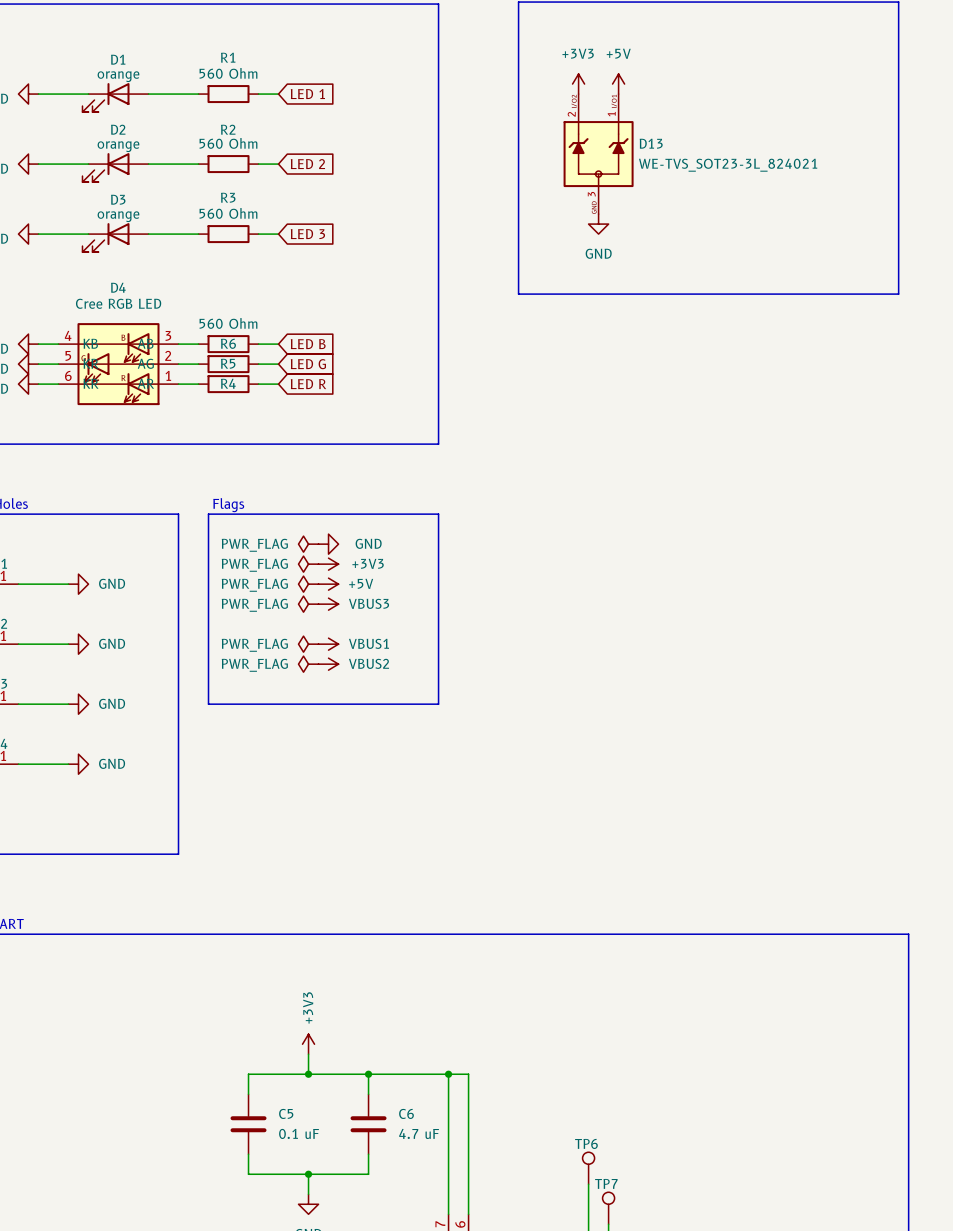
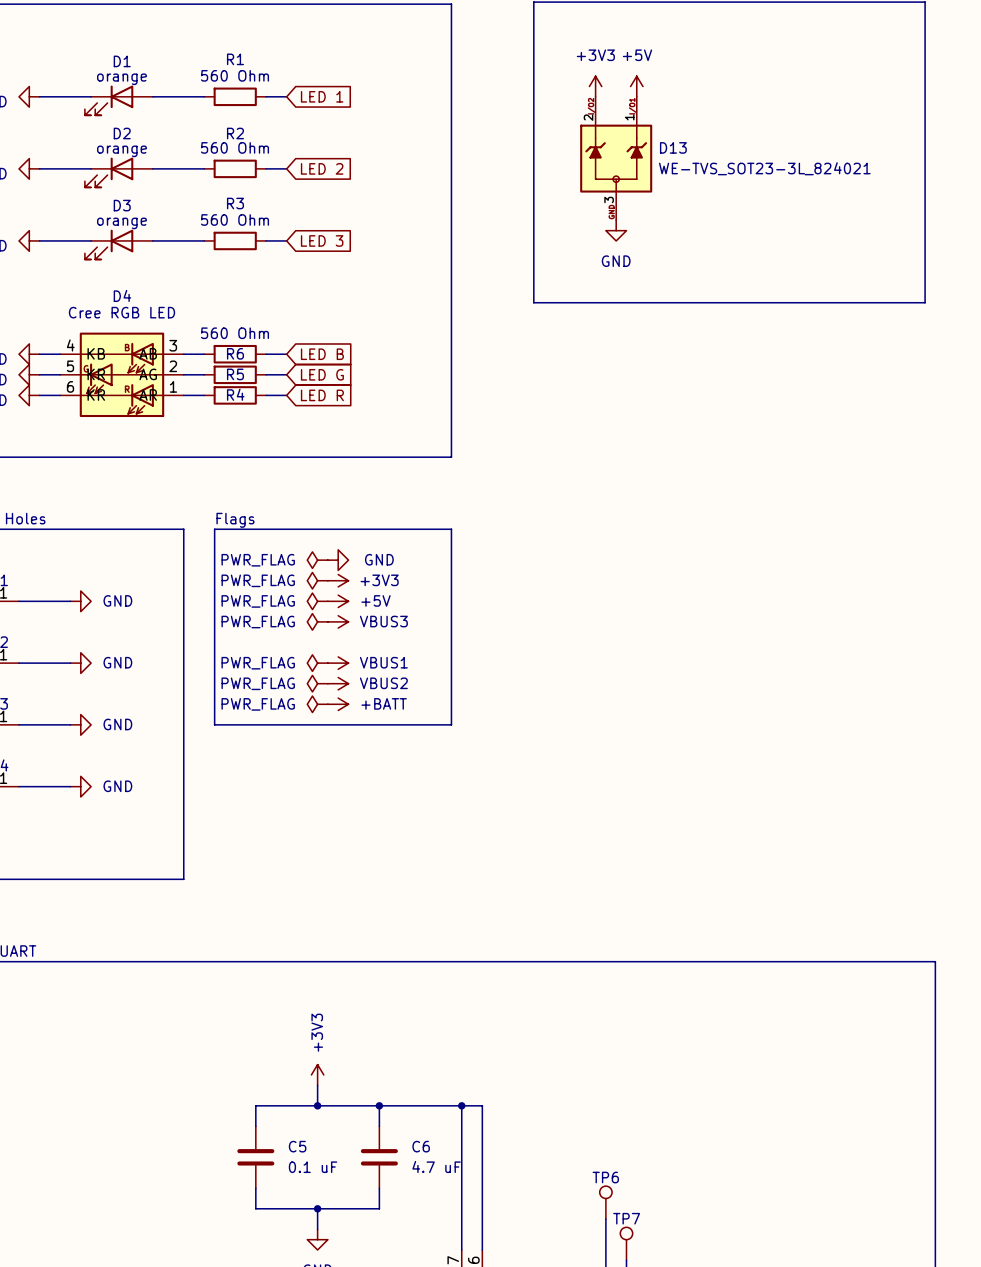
power symbol: none -> PWR_FLAG (317, 704)
power symbol: none -> +BATT (338, 704)

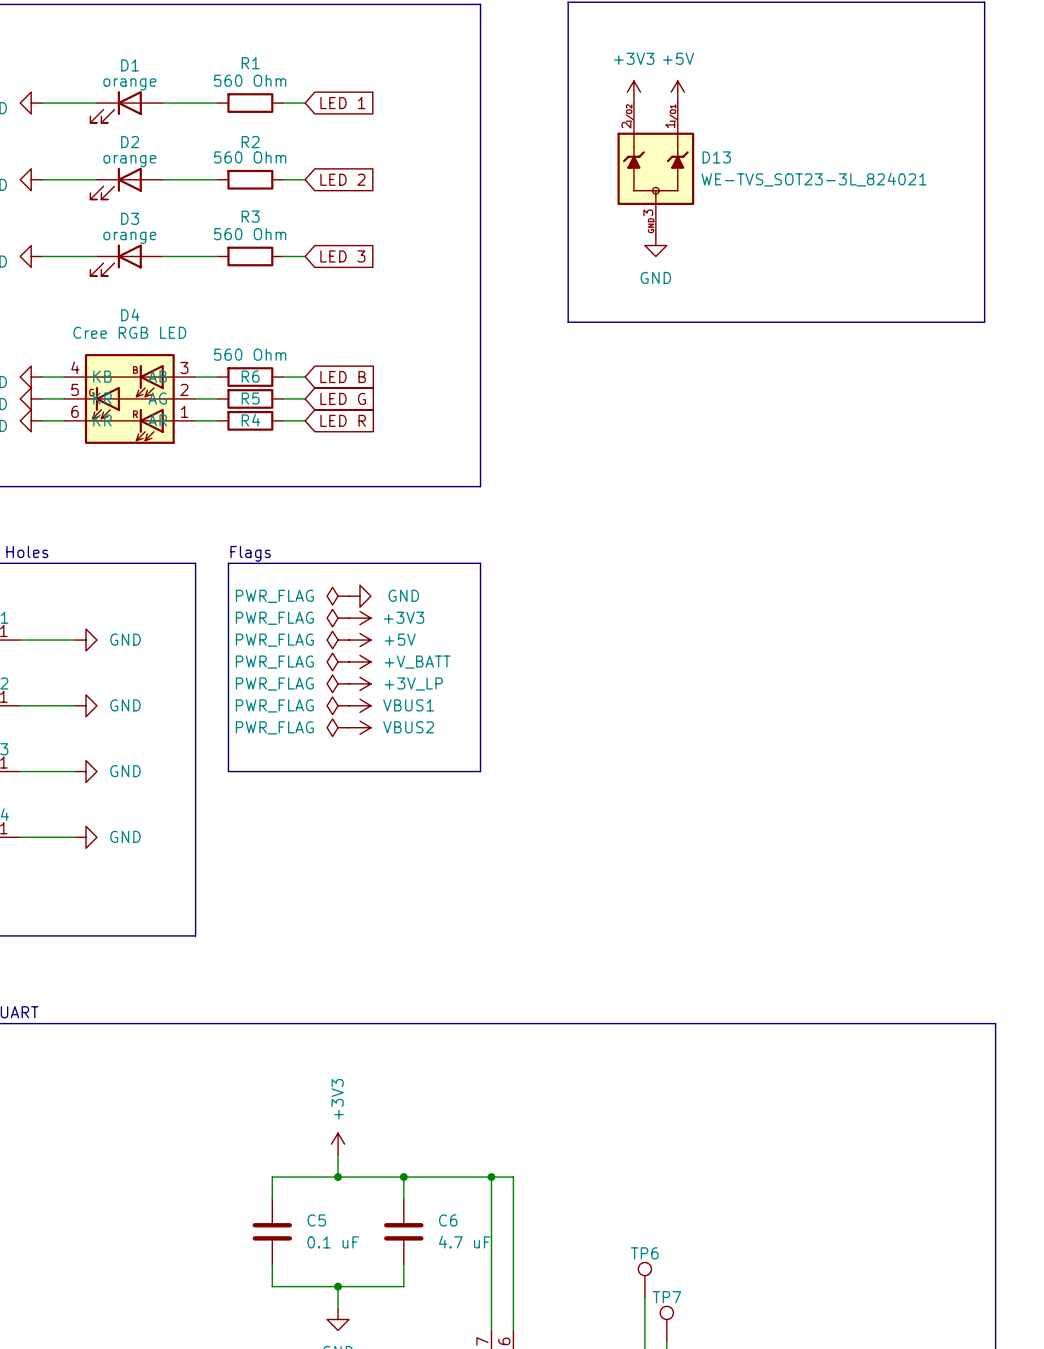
power symbol: VBUS3 (338, 621) -> +V_BATT (359, 661)
power symbol: none -> +3V_LP (359, 683)
power symbol position: PWR_FLAG (317, 704) -> PWR_FLAG (338, 683)
power symbol: +BATT (338, 704) -> none

